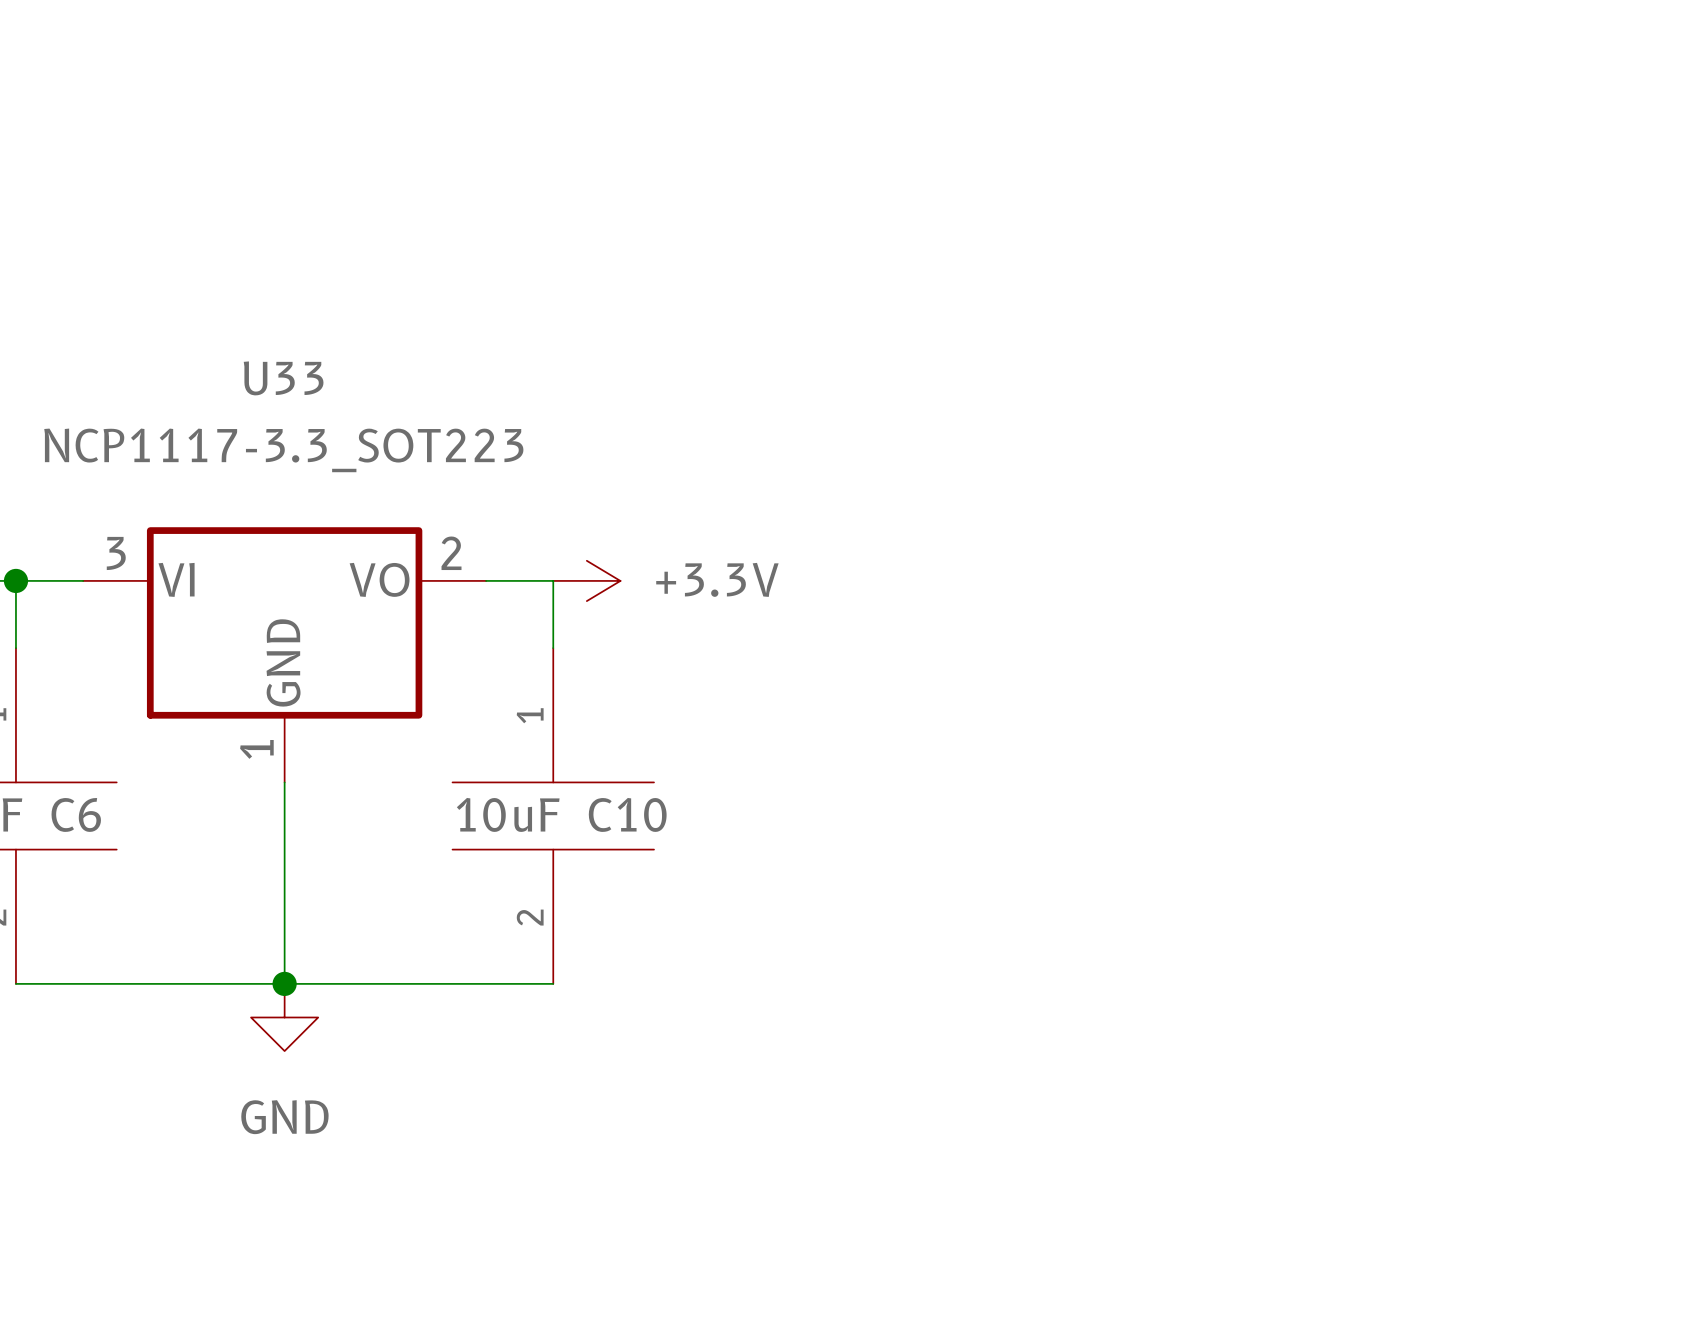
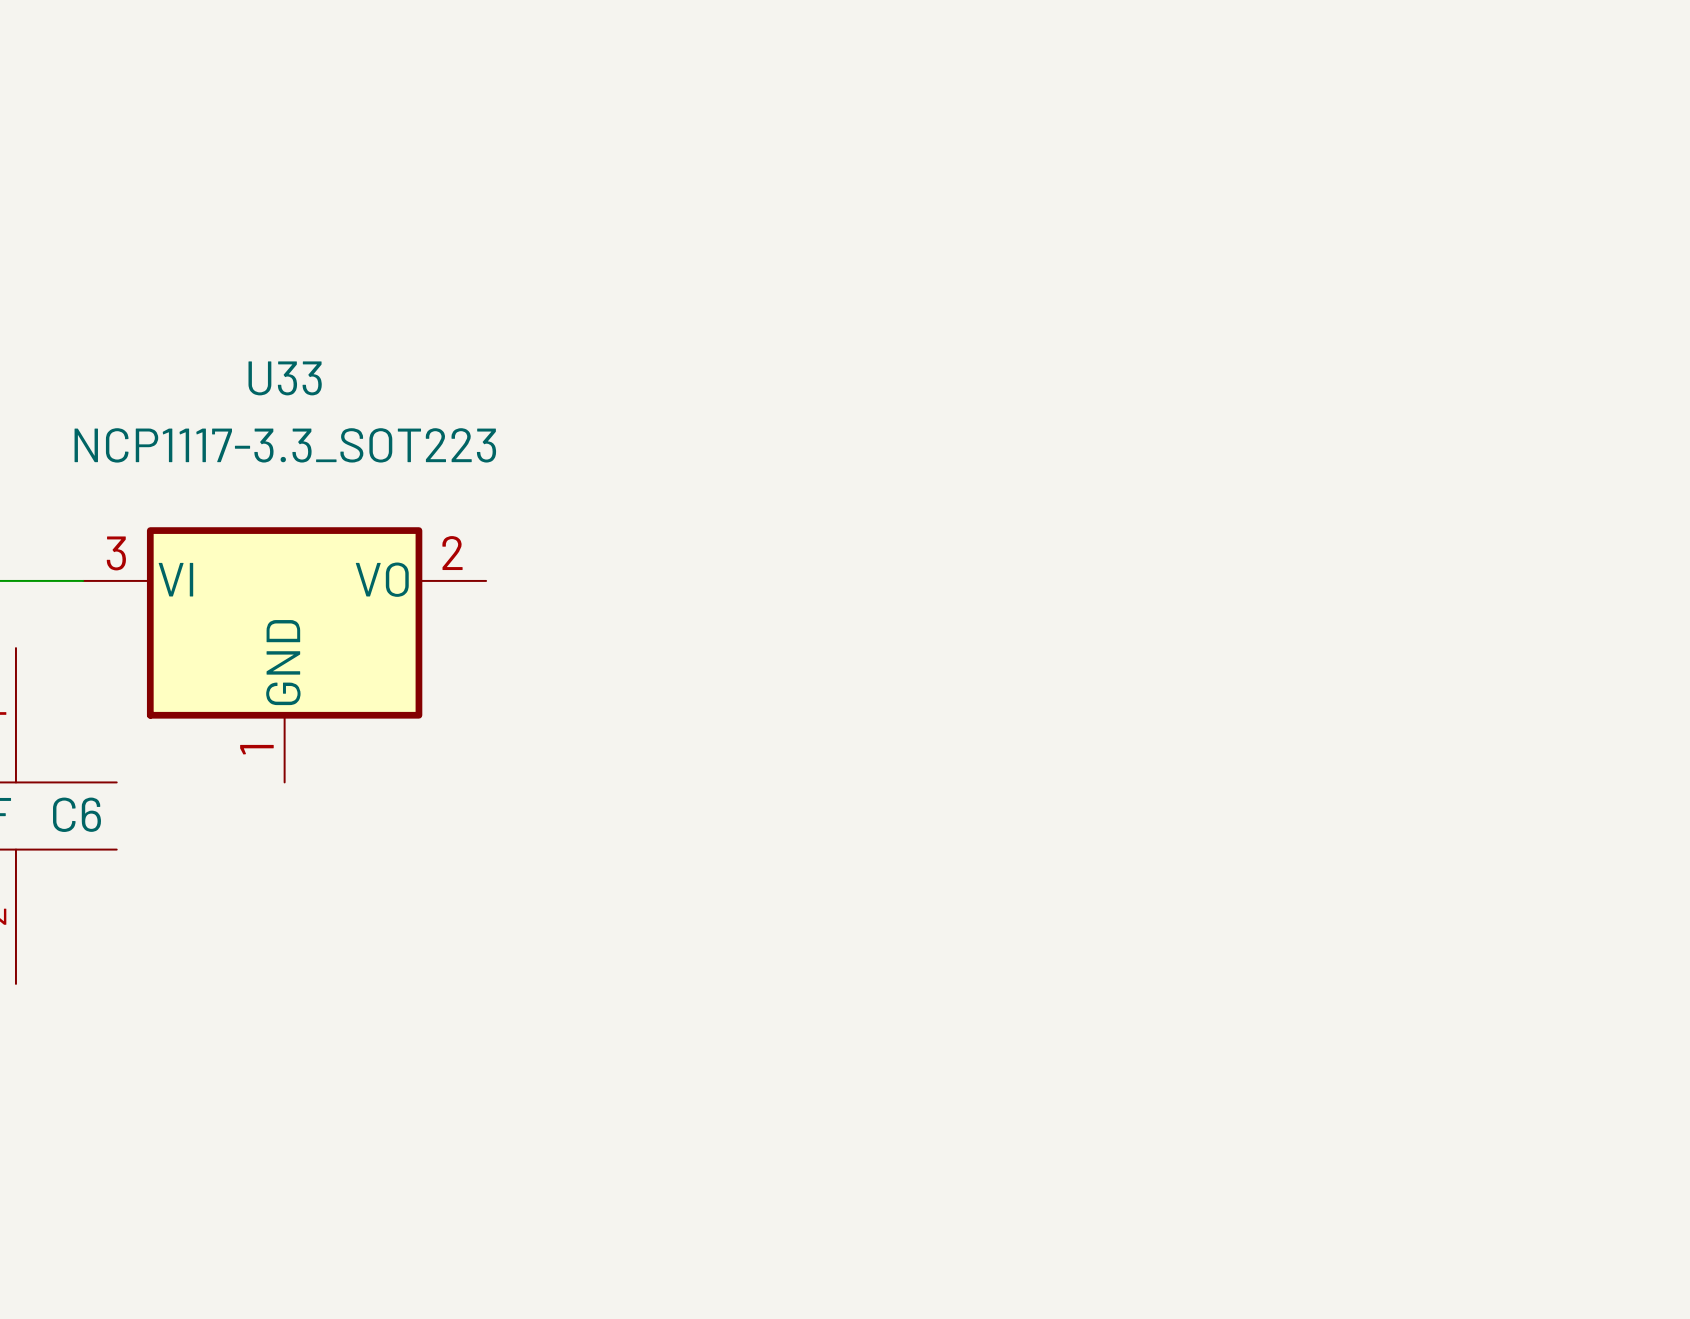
wire: (15, 580) (15, 648) -> none
junction: (15, 580) -> none
wire: (486, 580) (553, 580) (553, 648) -> none
power symbol: +3.3V (586, 580) -> none
wire: (284, 782) (284, 983) -> none
C10: 10uF (553, 816) -> none
wire: (15, 983) (553, 983) -> none
junction: (284, 983) -> none
power symbol: GND (284, 1017) -> none

